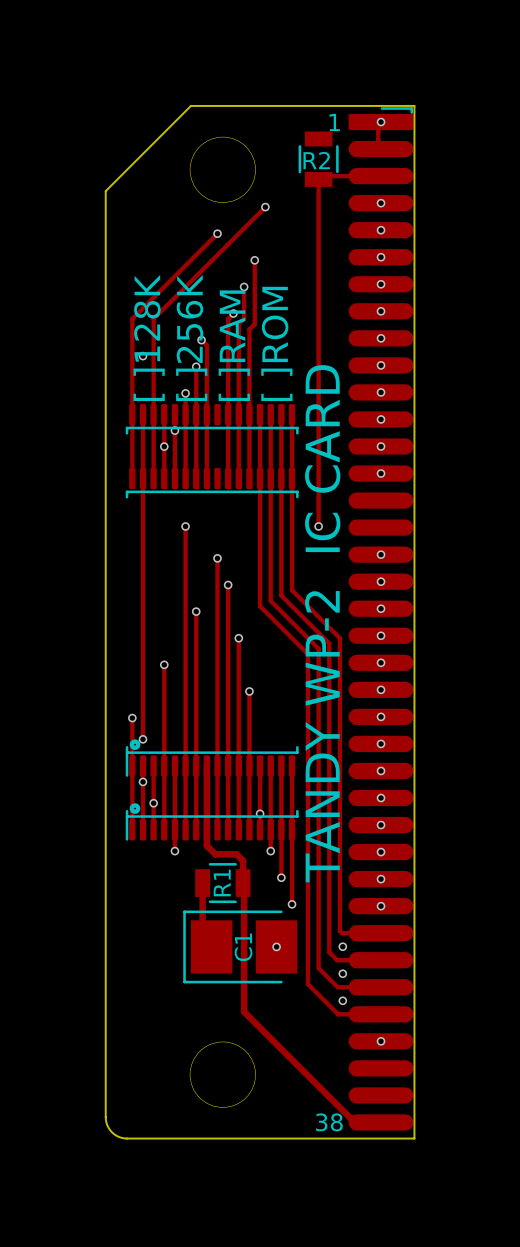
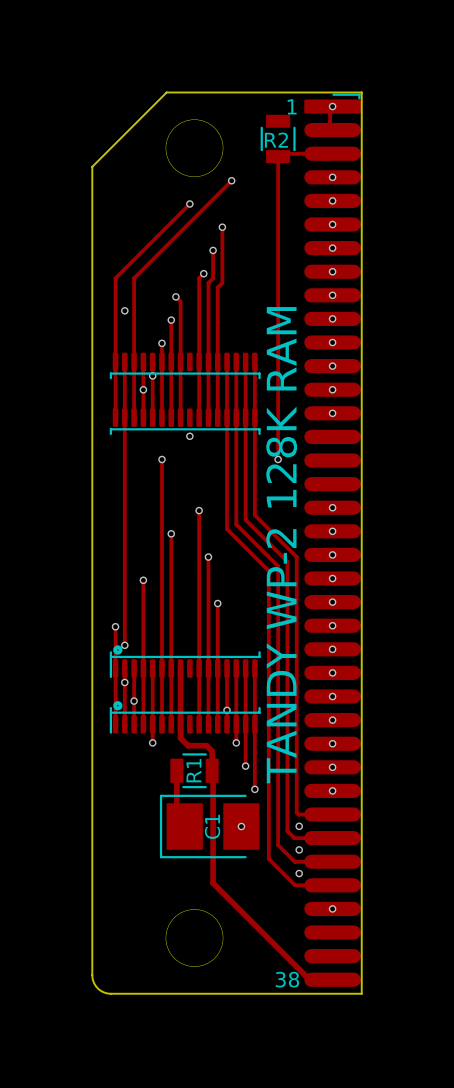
text: [ ]128K (149, 337) -> none
text: [ ]256K (191, 337) -> none
text: [ ]ROM (276, 343) -> none
text: [ ]RAM (234, 345) -> none
via: (381, 554) -> none
track: (217, 558) (217, 829) -> none
via position: (217, 558) -> (189, 436)
text: TANDY WP-2 IC CARD (322, 623) -> TANDY WP-2 128K RAM (281, 545)

